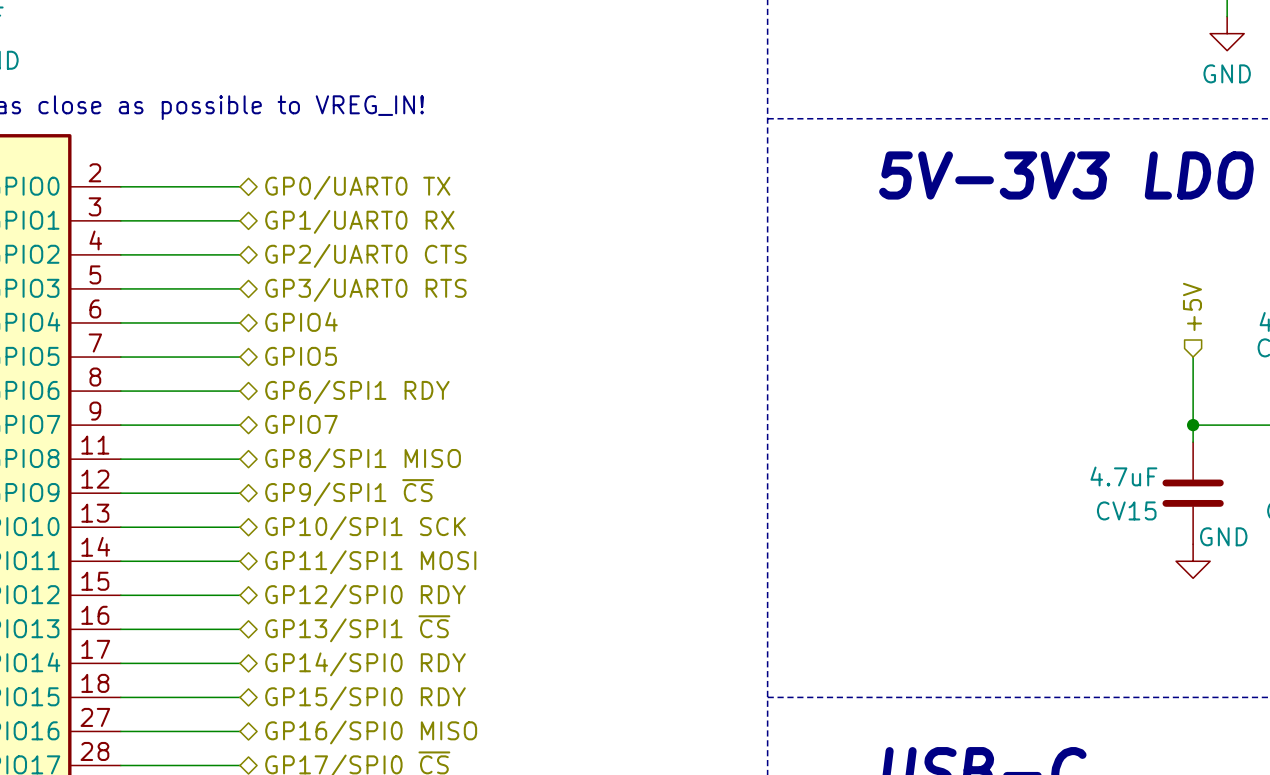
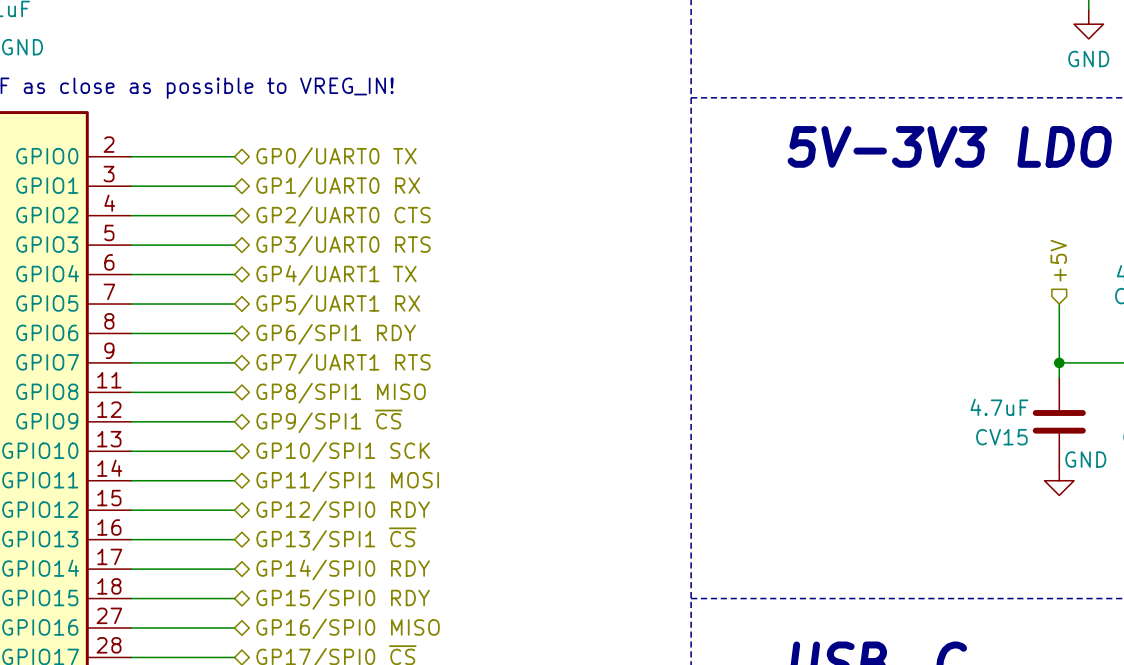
hierarchical label: GPIO4 (301, 321) -> GP4/UART1 TX (336, 275)
hierarchical label: GPIO5 (301, 356) -> GP5/UART1 RX (338, 304)
hierarchical label: GPIO7 (301, 424) -> GP7/UART1 RTS (343, 363)

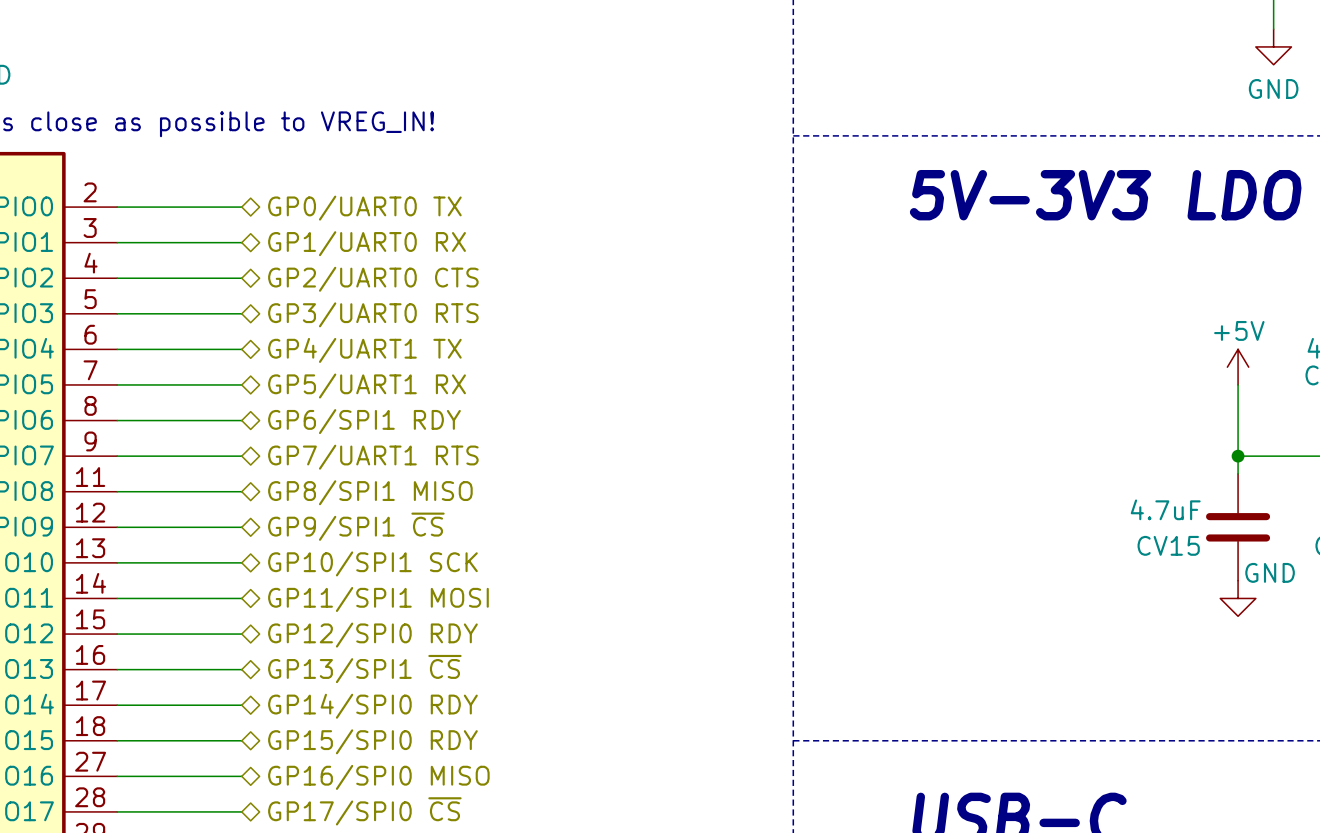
hierarchical label: +5V (1058, 260) -> none
power symbol: none -> +5V (1238, 367)

